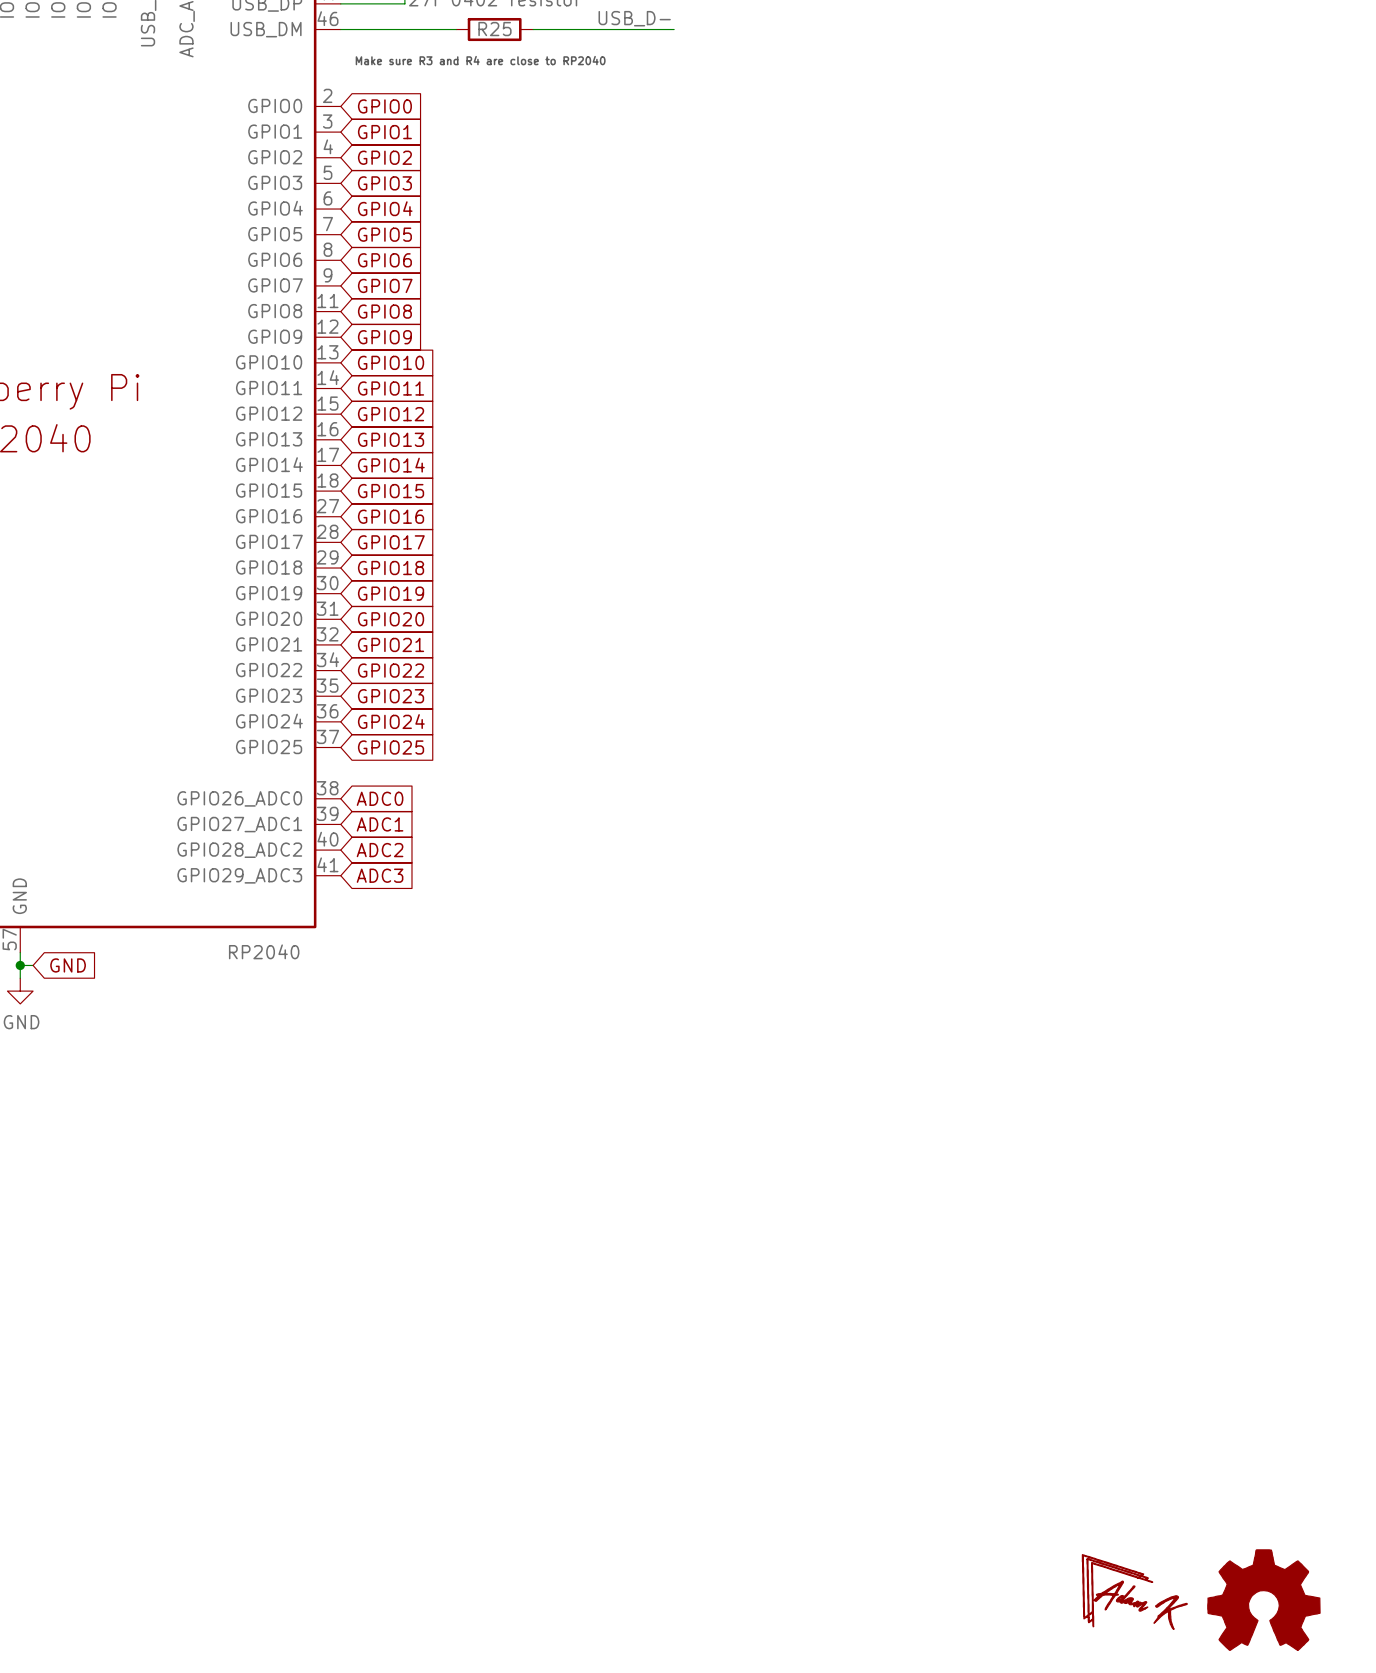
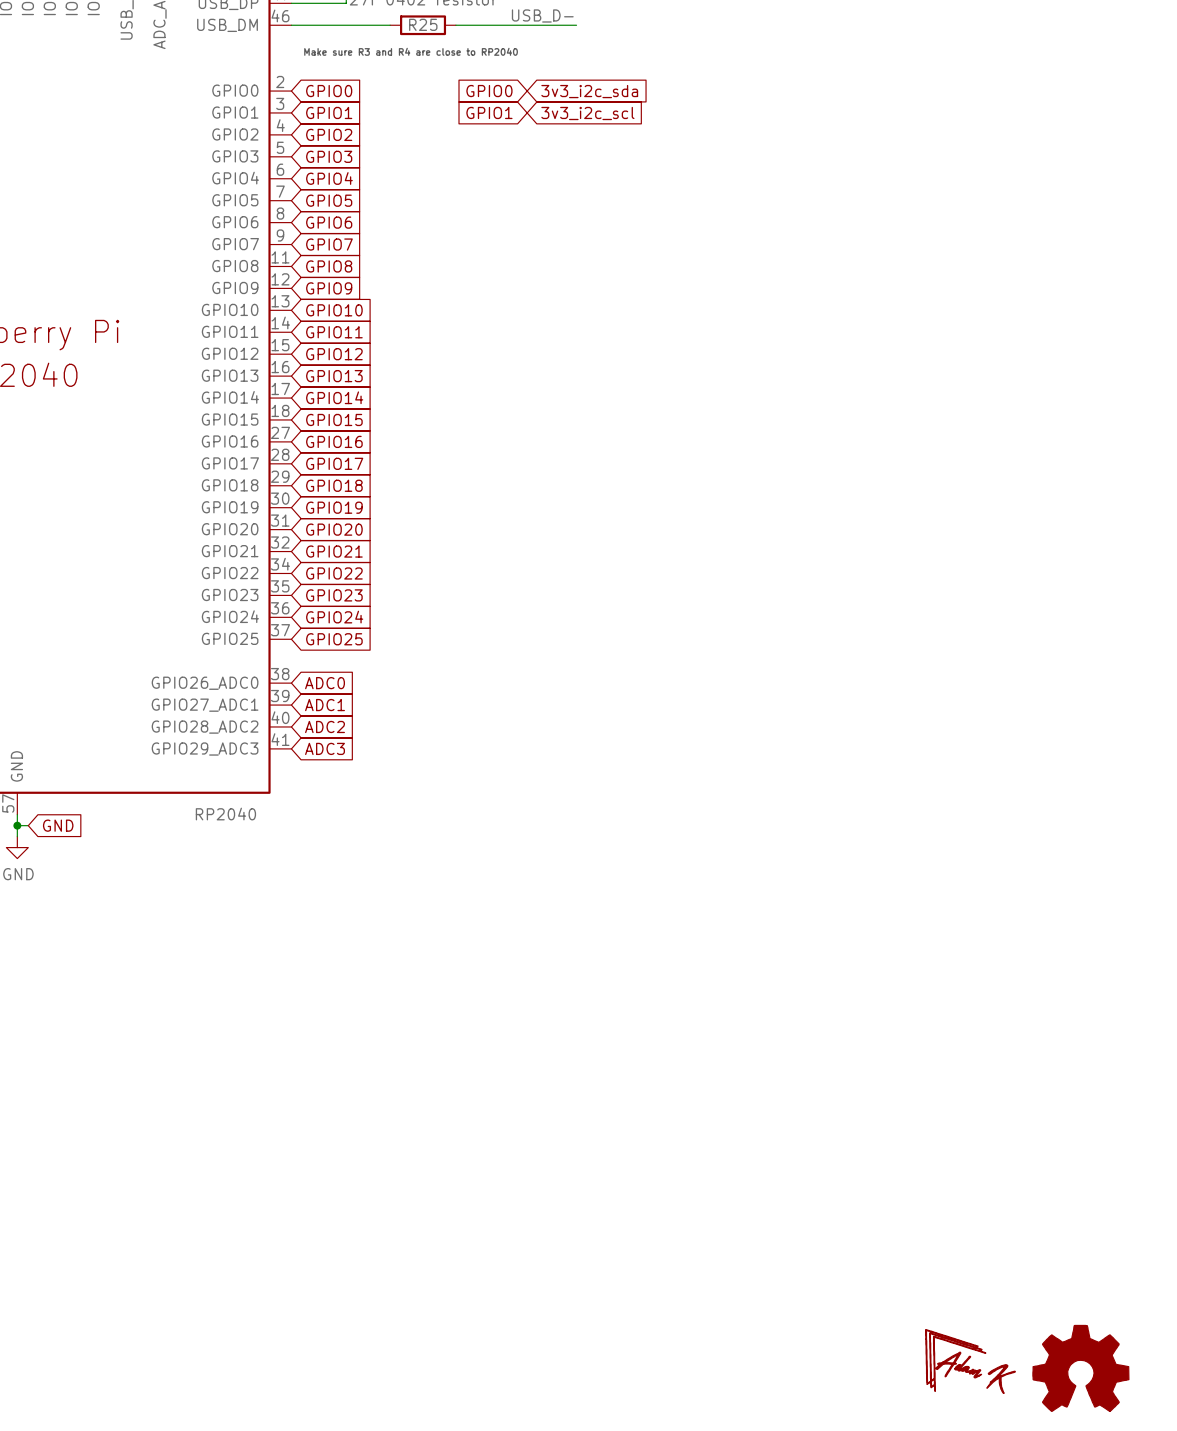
global label: none -> GPIO0 (489, 91)
global label: none -> 3v3_i2c_sda (589, 91)
global label: none -> GPIO1 (489, 112)
global label: none -> 3v3_i2c_scl (587, 113)

